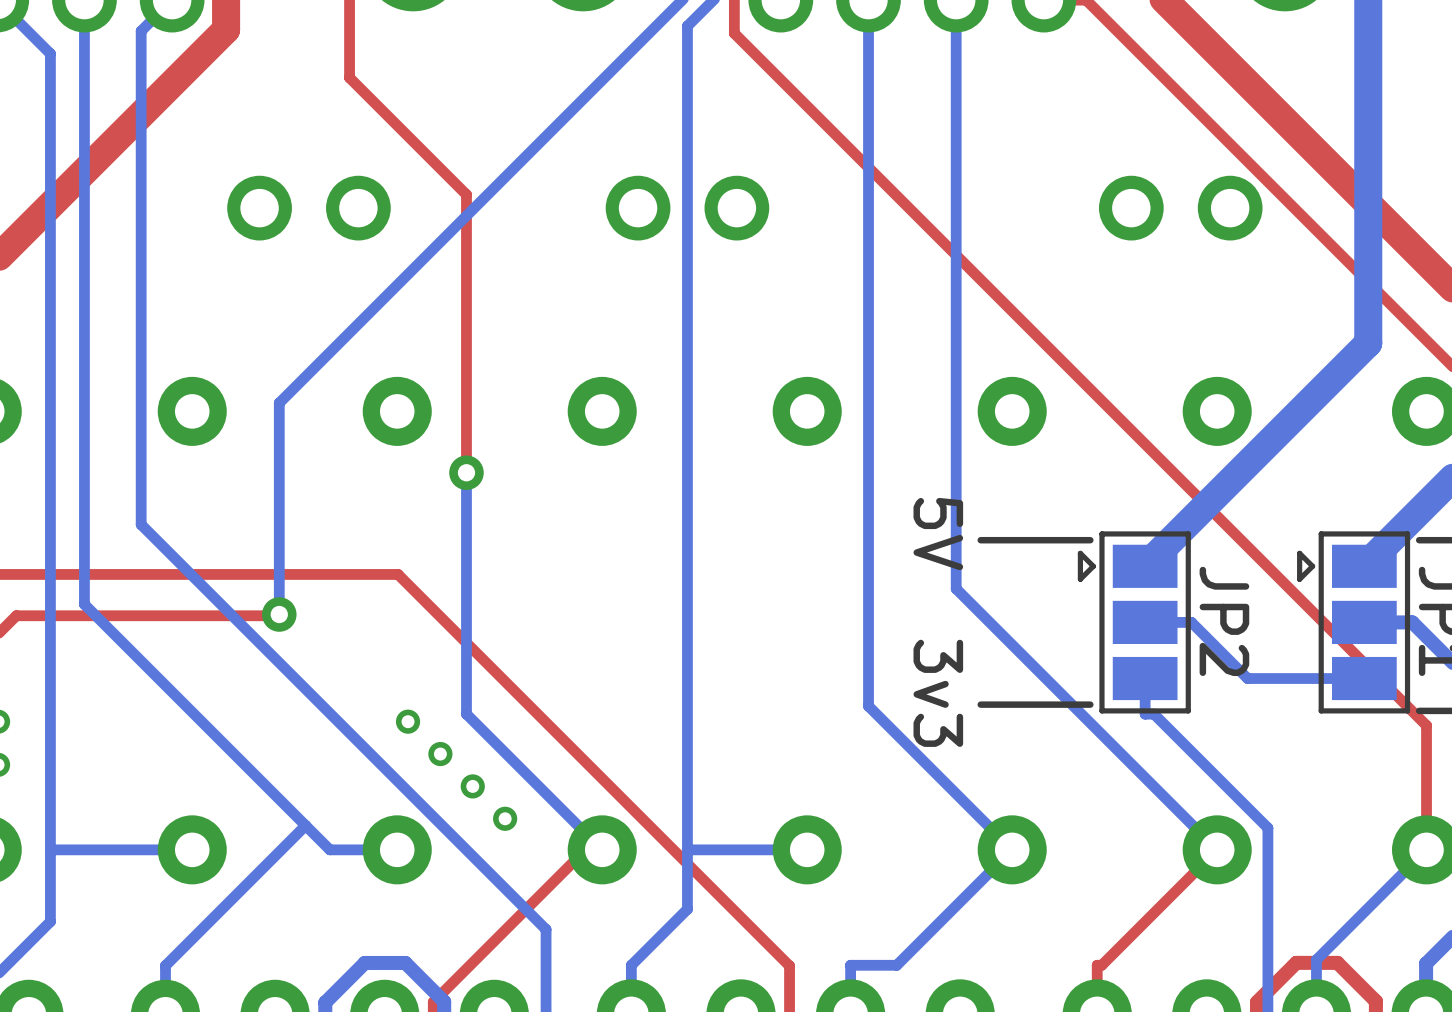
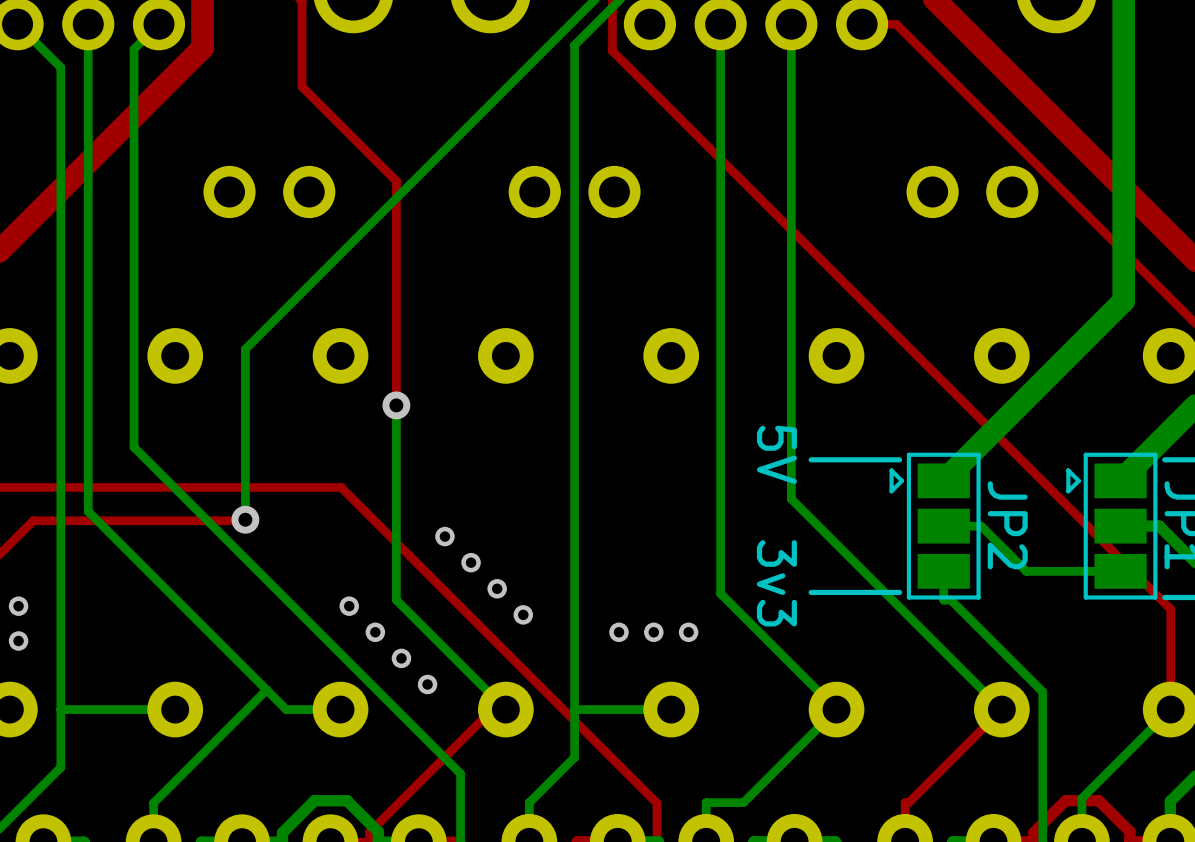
via: none -> (444, 536)
via: none -> (471, 562)
via: none -> (497, 588)
via: none -> (523, 614)
via: none -> (619, 632)
via: none -> (653, 632)
via: none -> (688, 632)

